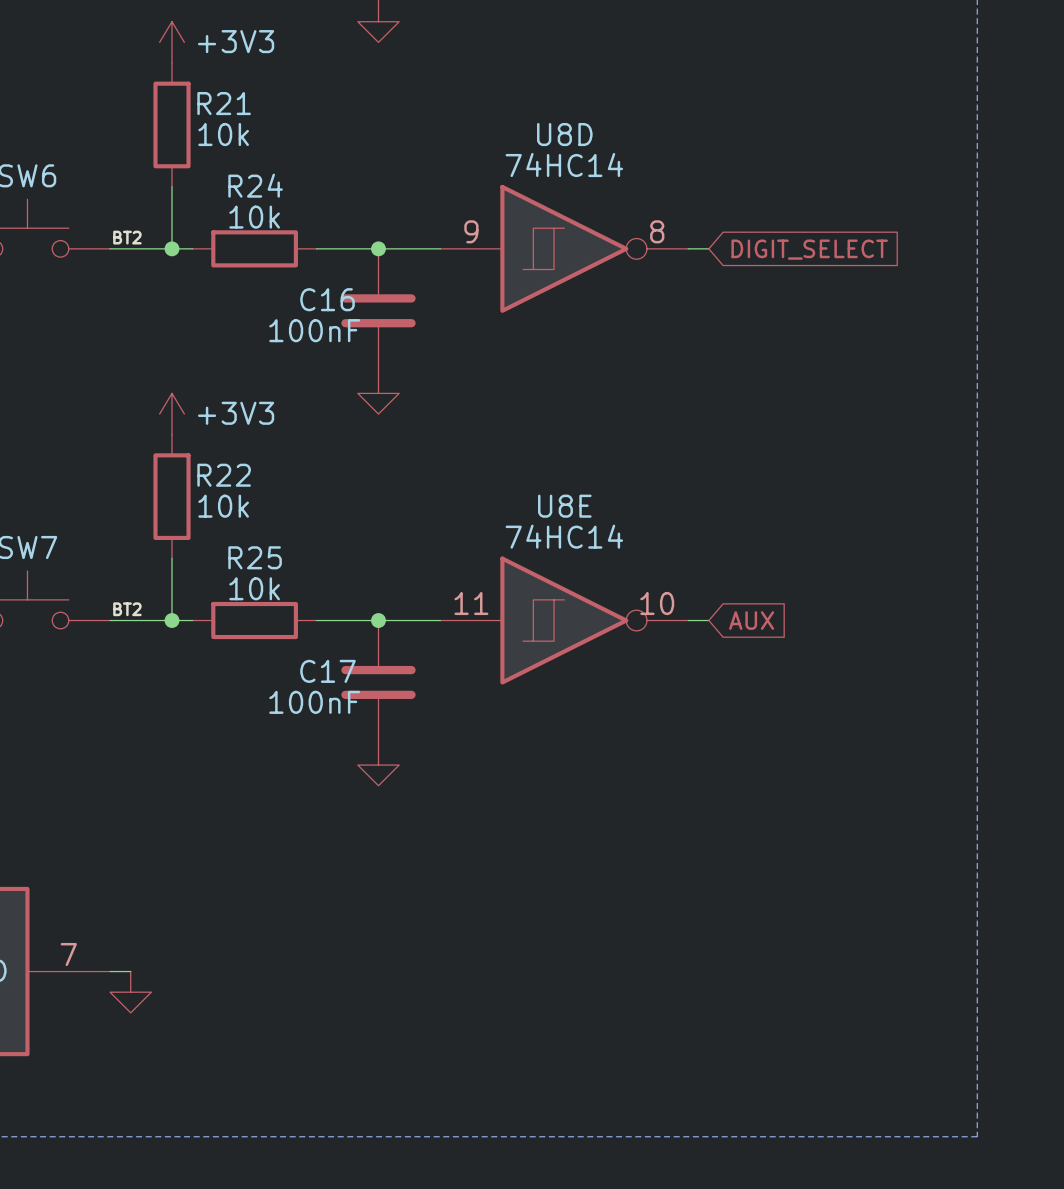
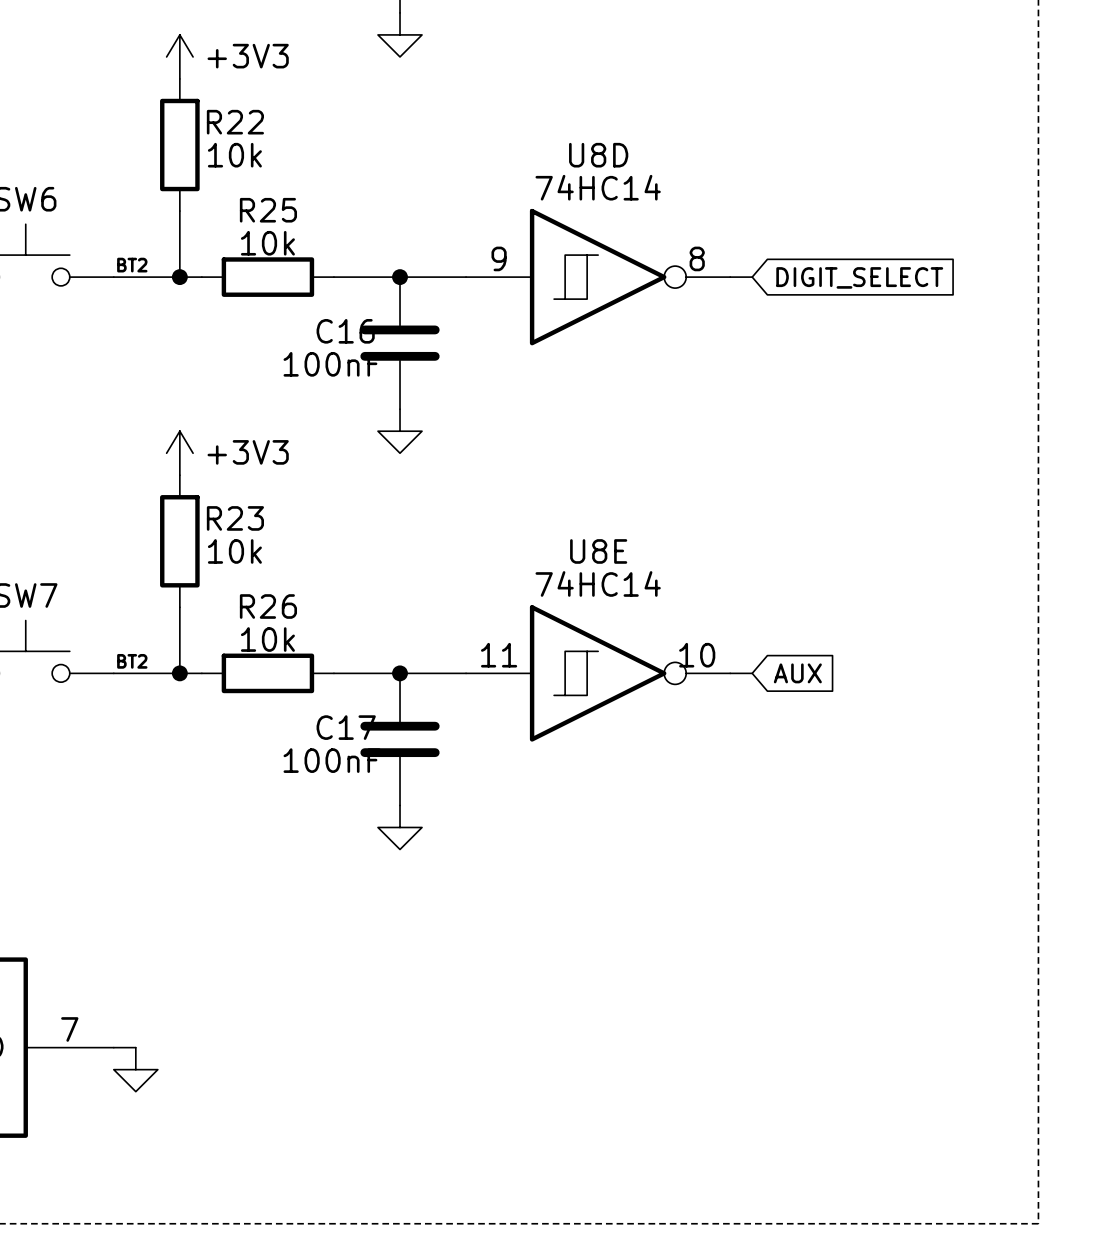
R21 name: R21 (224, 103) -> R22 (235, 122)
R24 name: R24 (255, 185) -> R25 (268, 210)
R22 name: R22 (224, 475) -> R23 (235, 518)
R25 name: R25 (255, 557) -> R26 (268, 606)

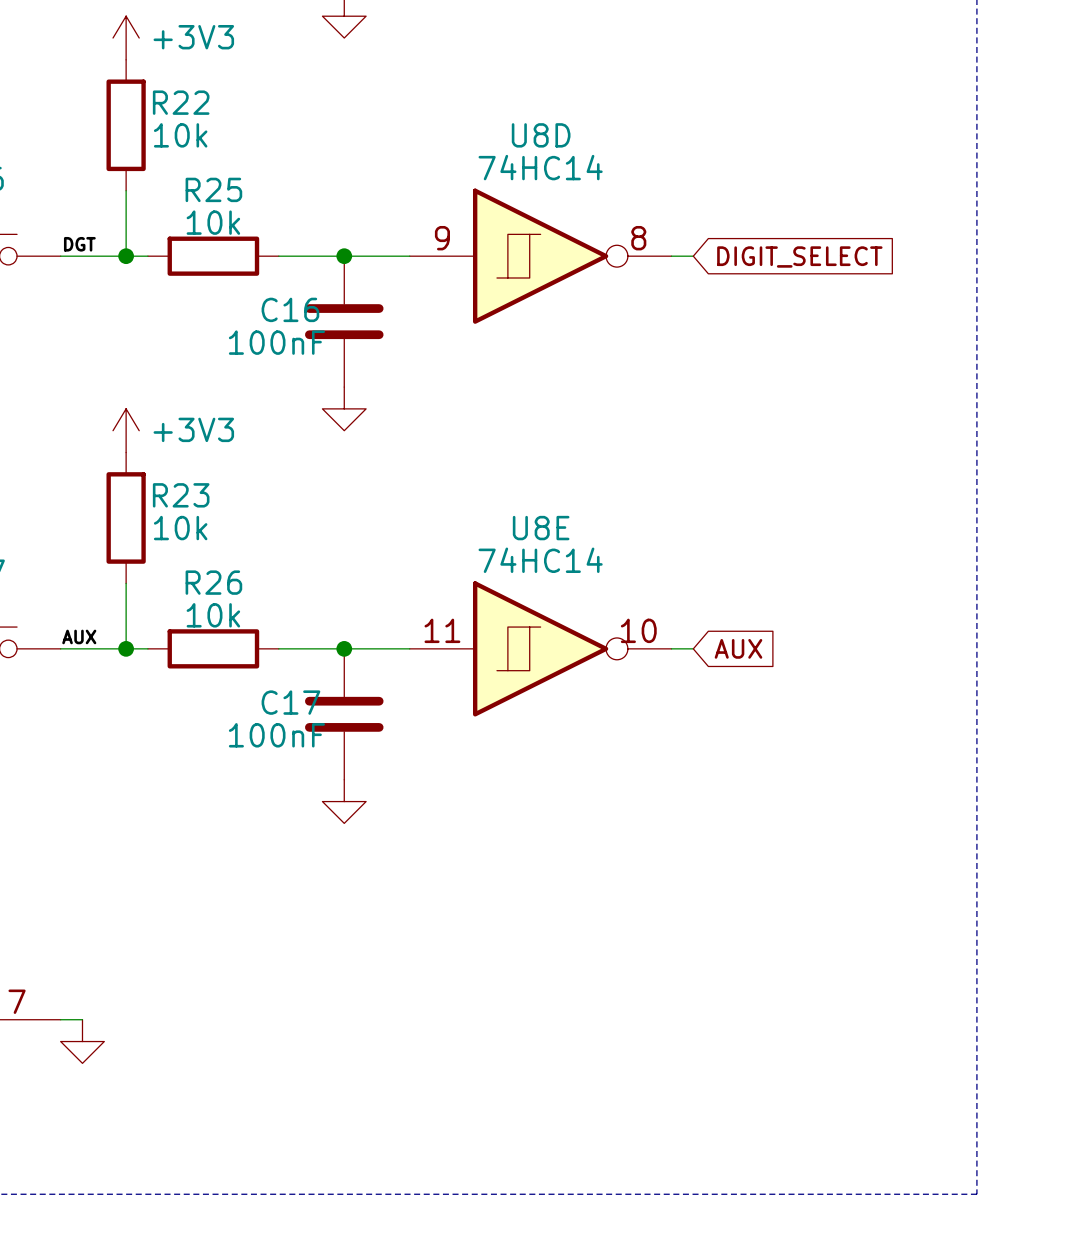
label: BT2 (132, 265) -> DGT (79, 244)
label: BT2 (132, 661) -> AUX (79, 636)

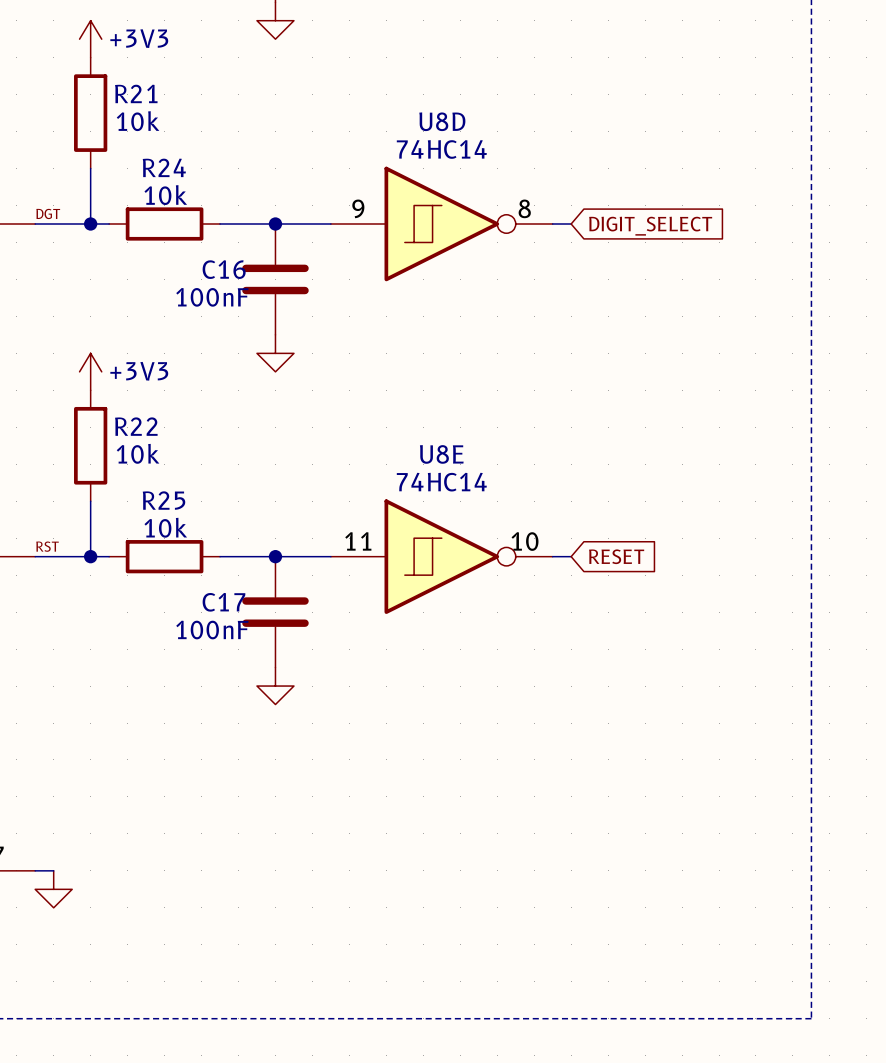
R22 name: R22 (181, 102) -> R21 (136, 93)
R25 name: R25 (213, 189) -> R24 (164, 167)
R23 name: R23 (181, 495) -> R22 (136, 426)
R26 name: R26 (213, 582) -> R25 (163, 500)
label: AUX (79, 636) -> RST (47, 546)
global label: AUX (738, 648) -> RESET (616, 556)

